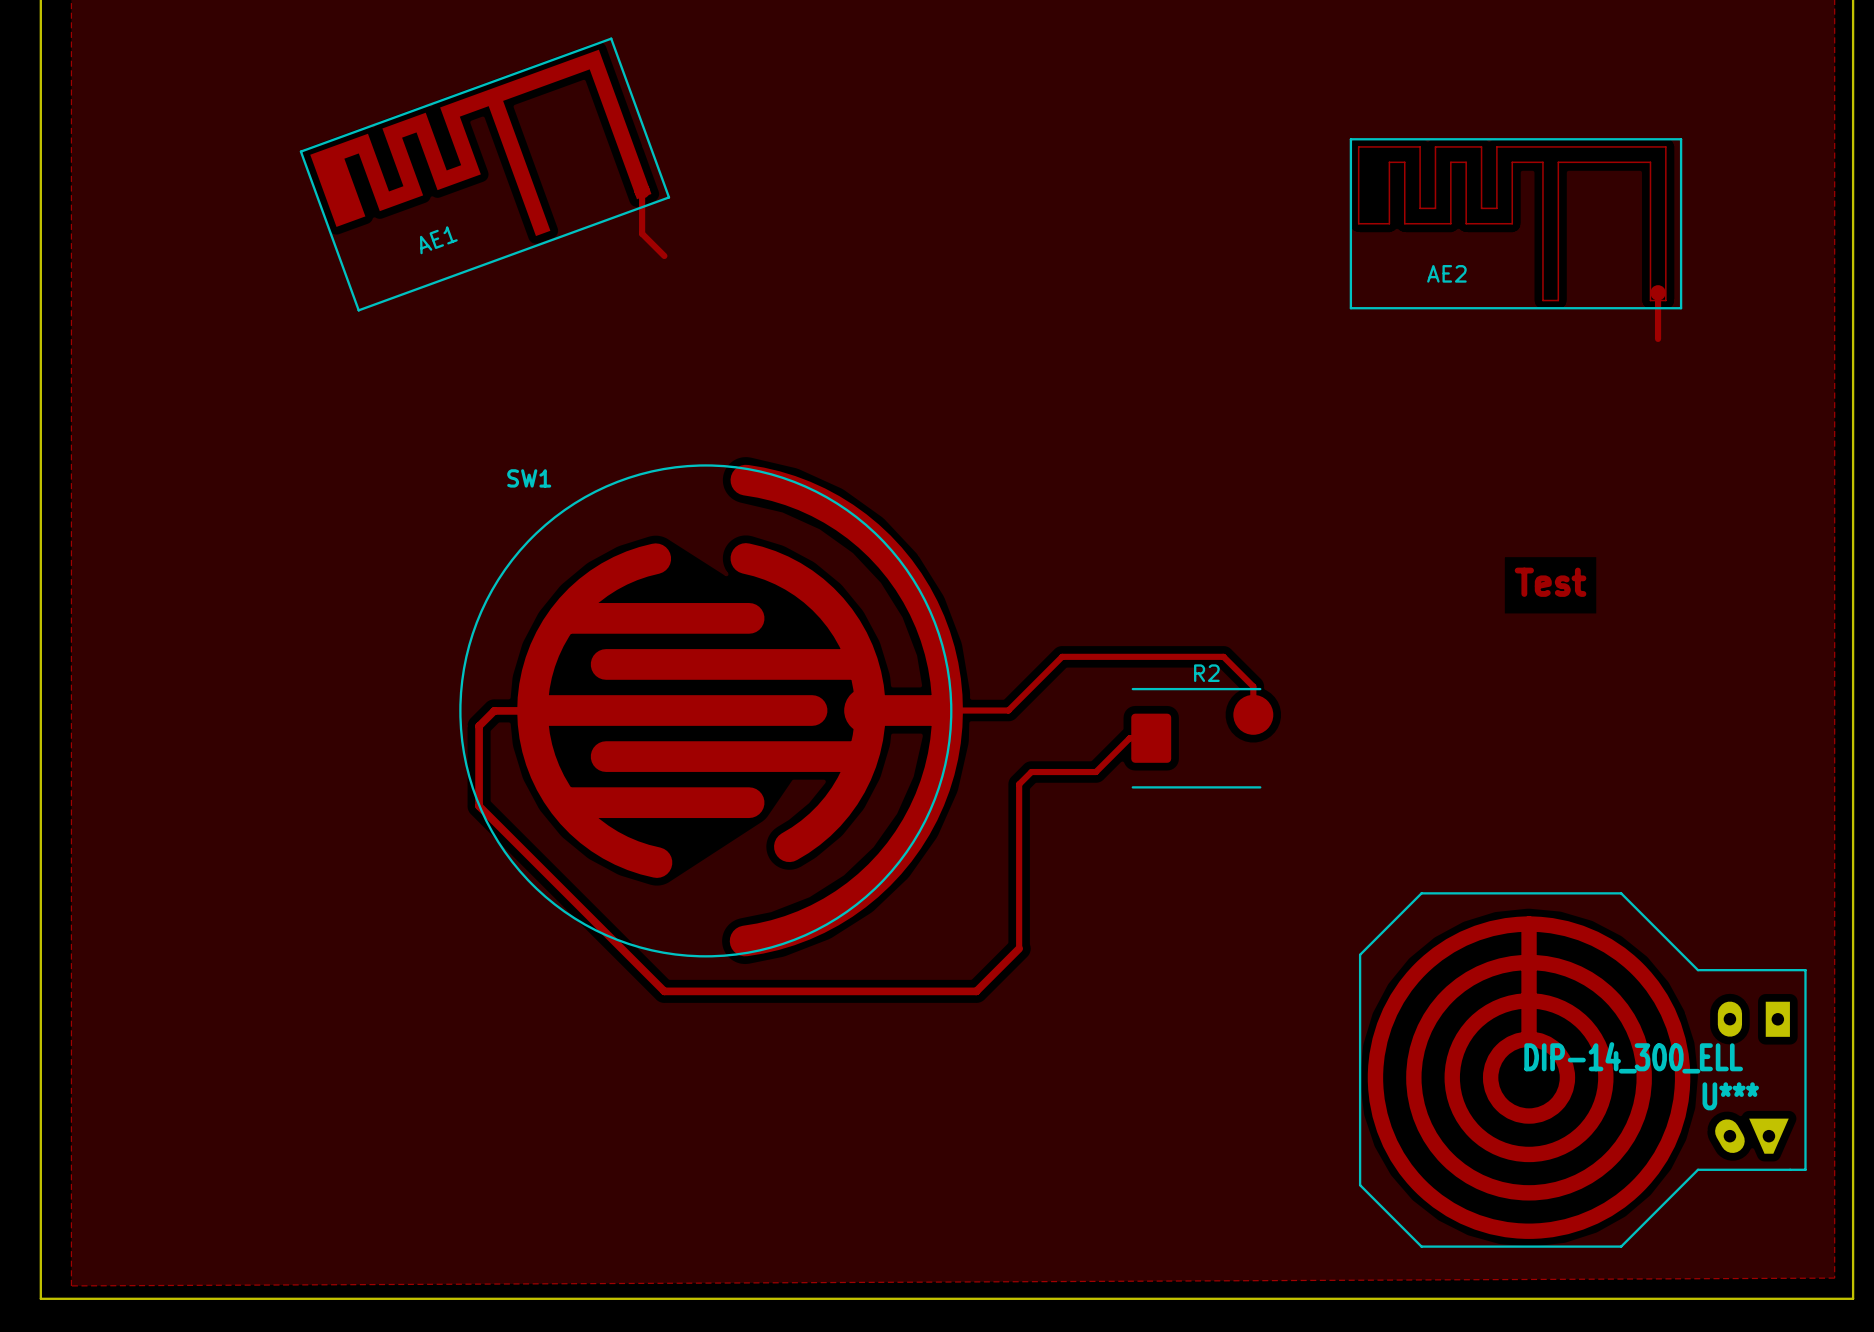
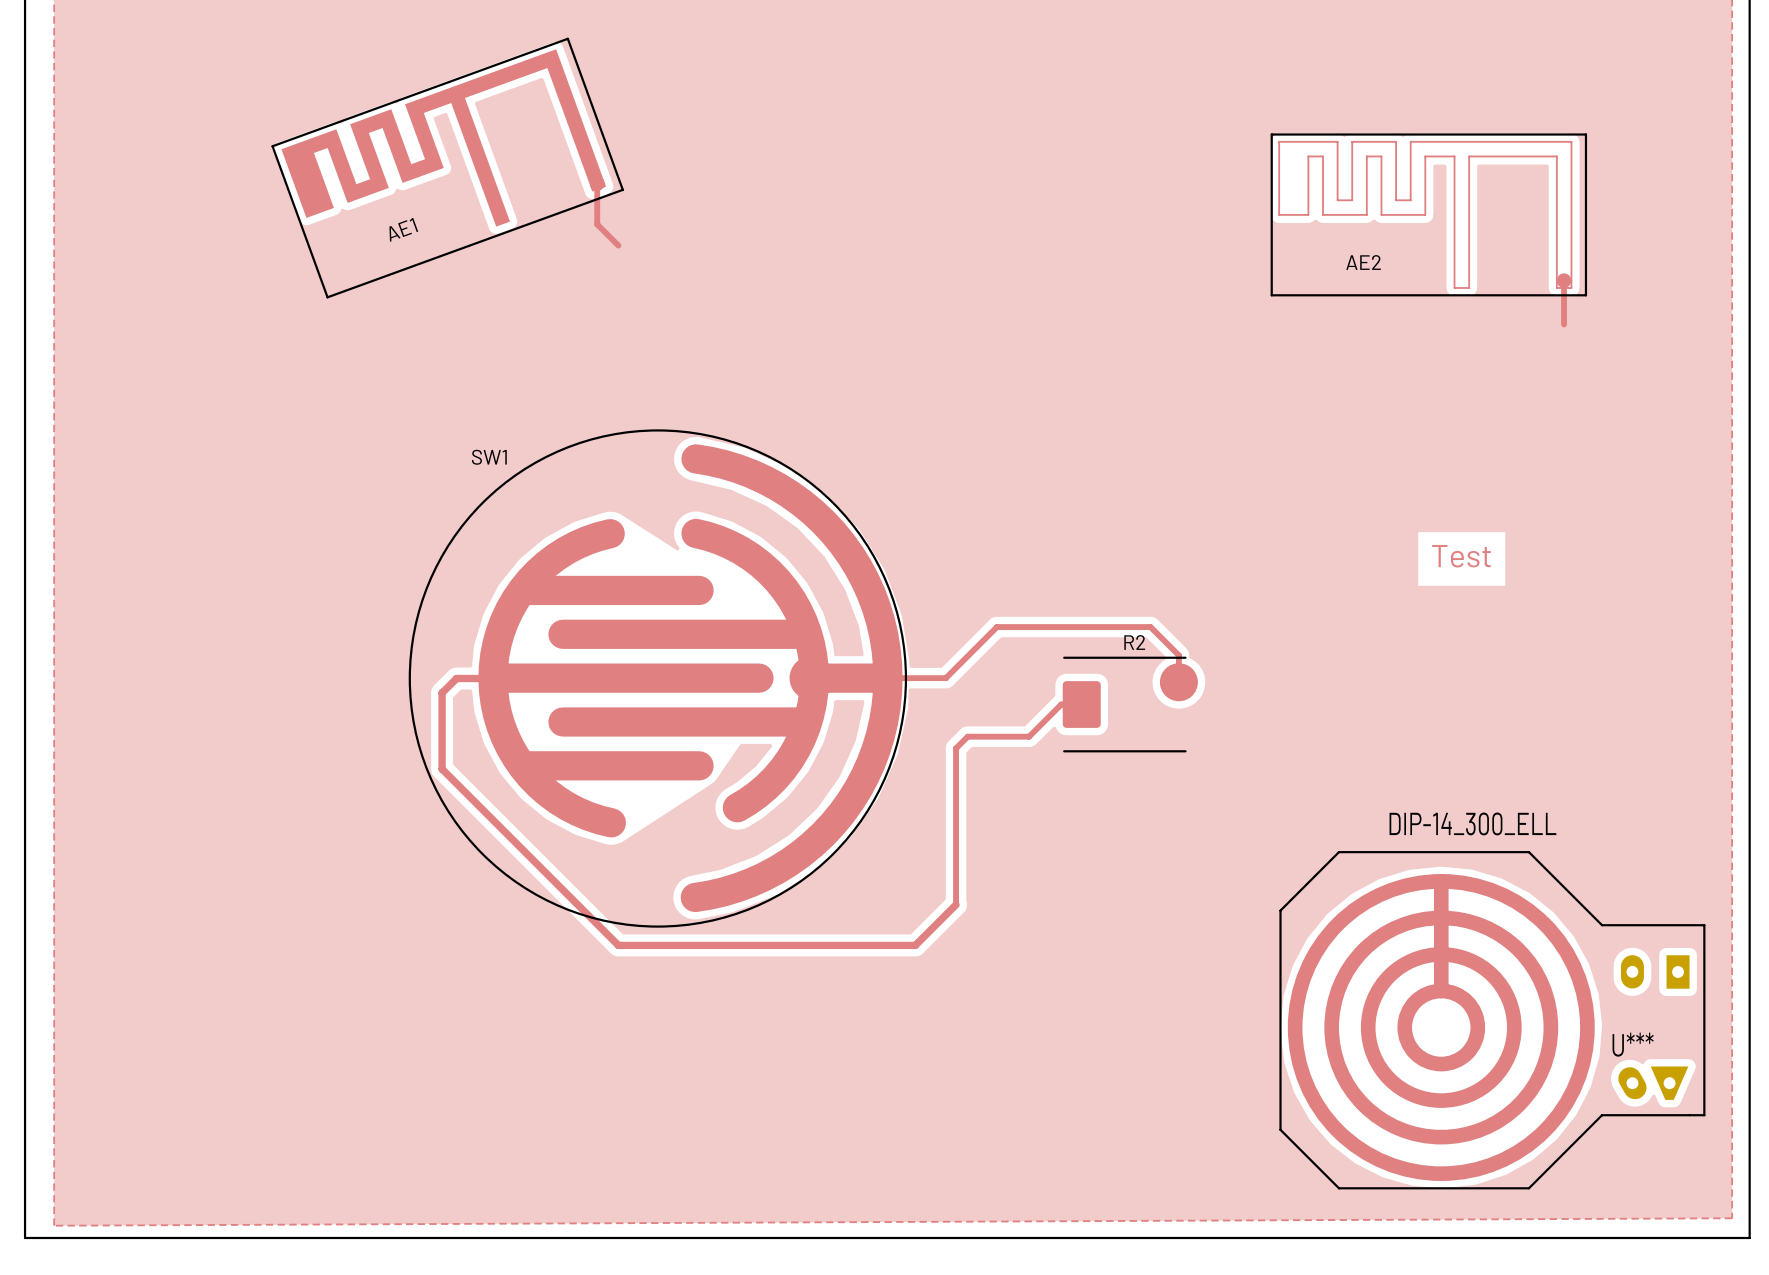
SW1 footprint: [459, 464, 963, 958] -> [408, 429, 908, 928]
U*** value position: DIP-14_300_ELL (1633, 1057) -> DIP-14_300_ELL (1472, 823)

